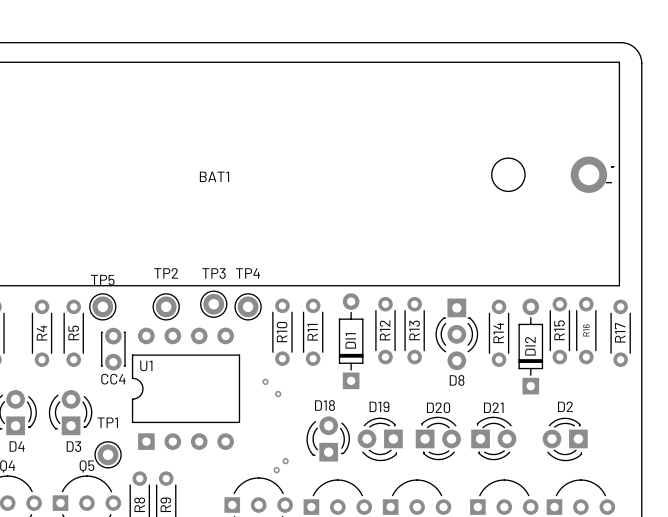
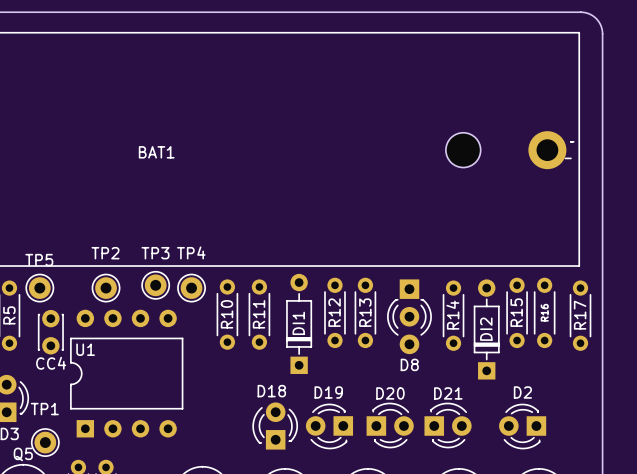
part: (265, 381) -> none
part: (278, 394) -> none
part: (285, 461) -> none
part: (276, 470) -> none

